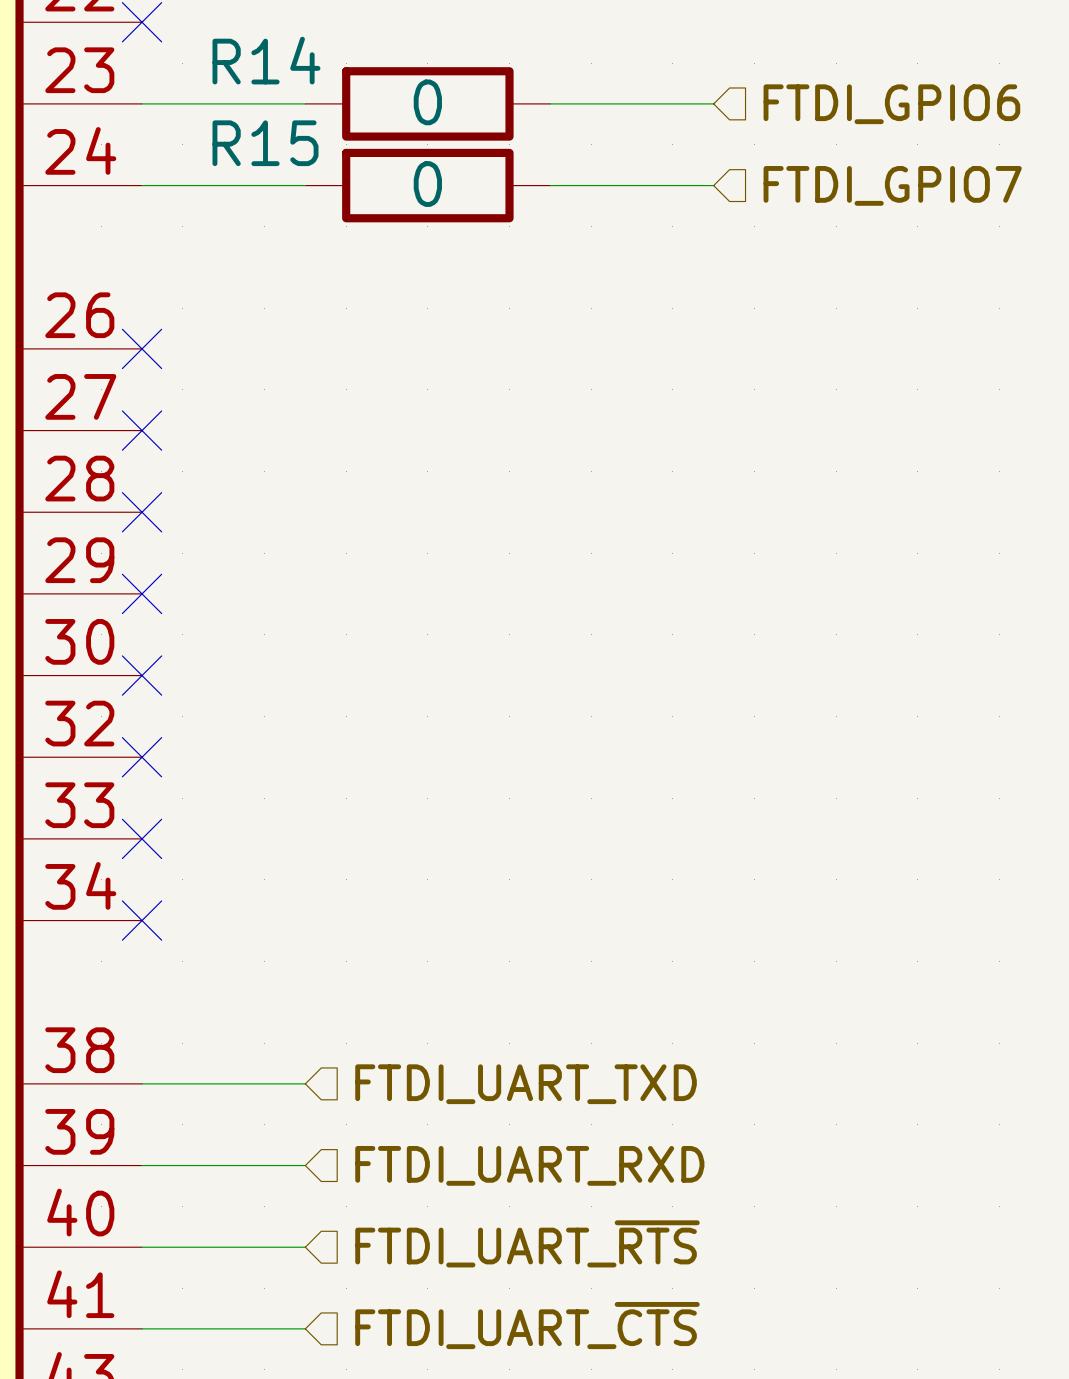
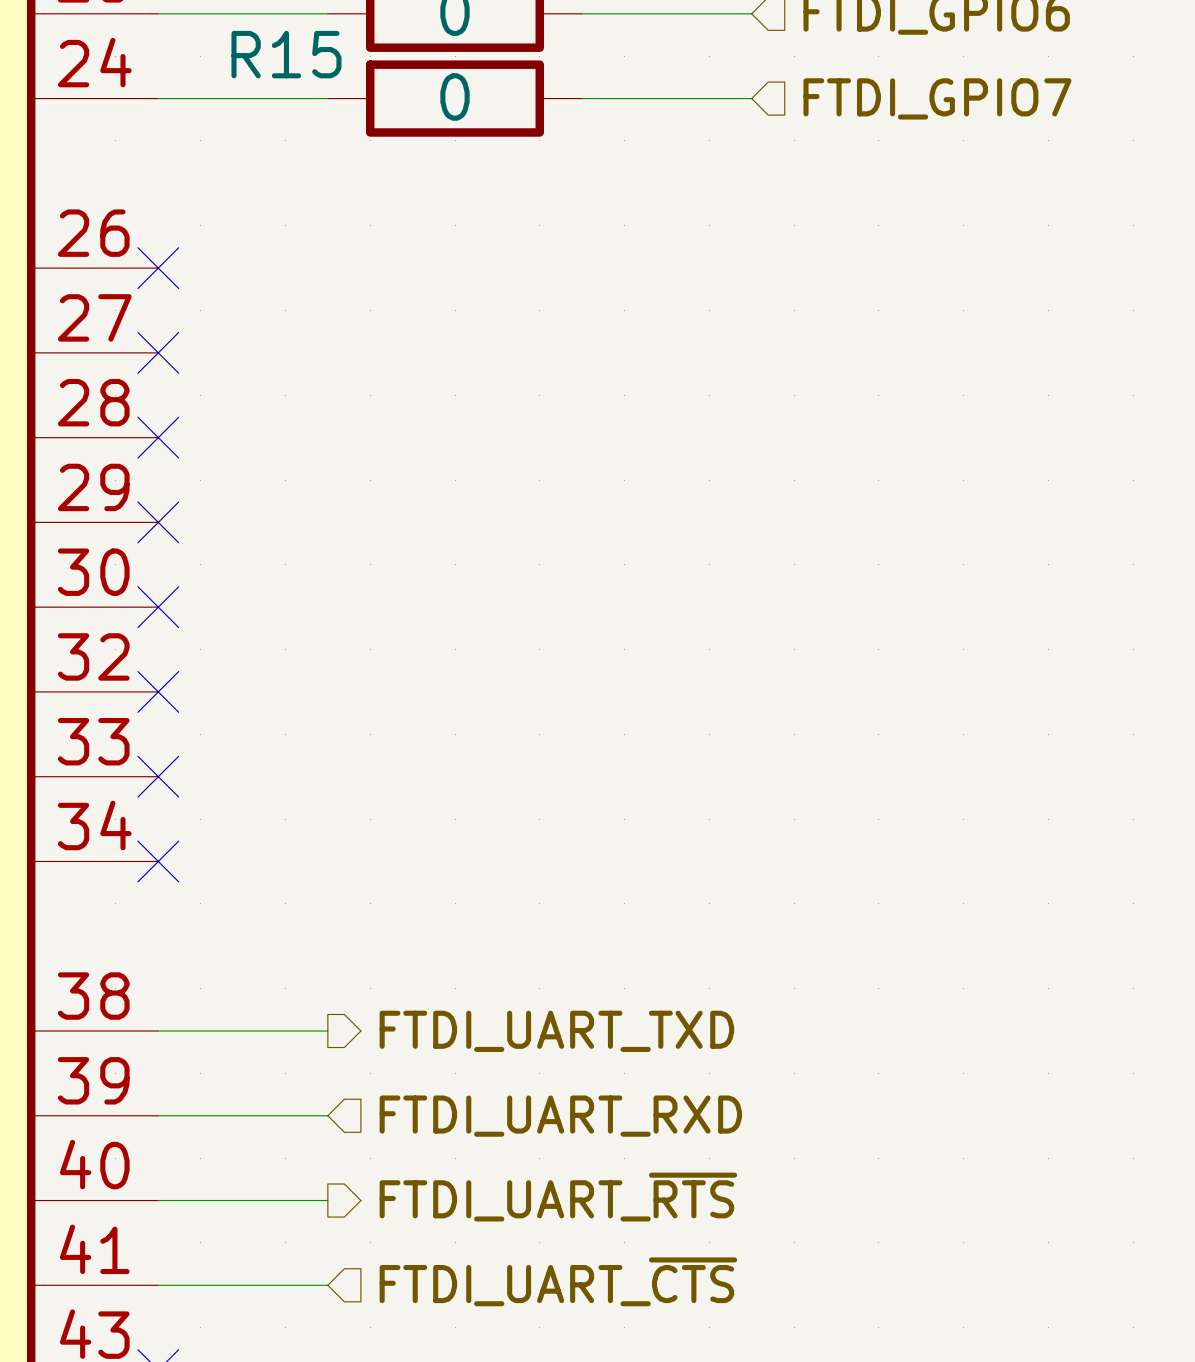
hierarchical label shape: input (526, 1084) -> output (556, 1031)
hierarchical label shape: input (527, 1243) -> output (558, 1197)

